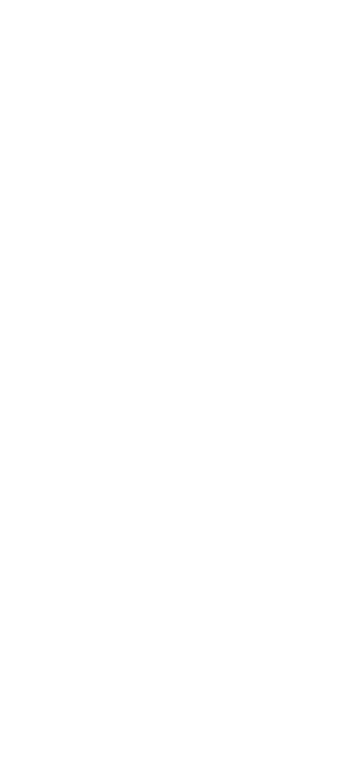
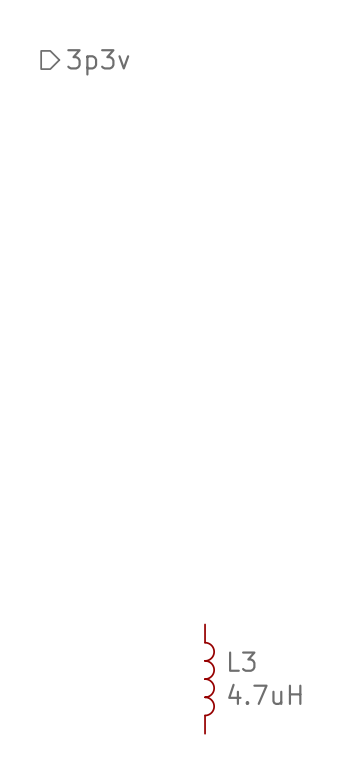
hierarchical label: none -> 3p3v (98, 62)
L3: none -> 4.7uH (209, 679)

